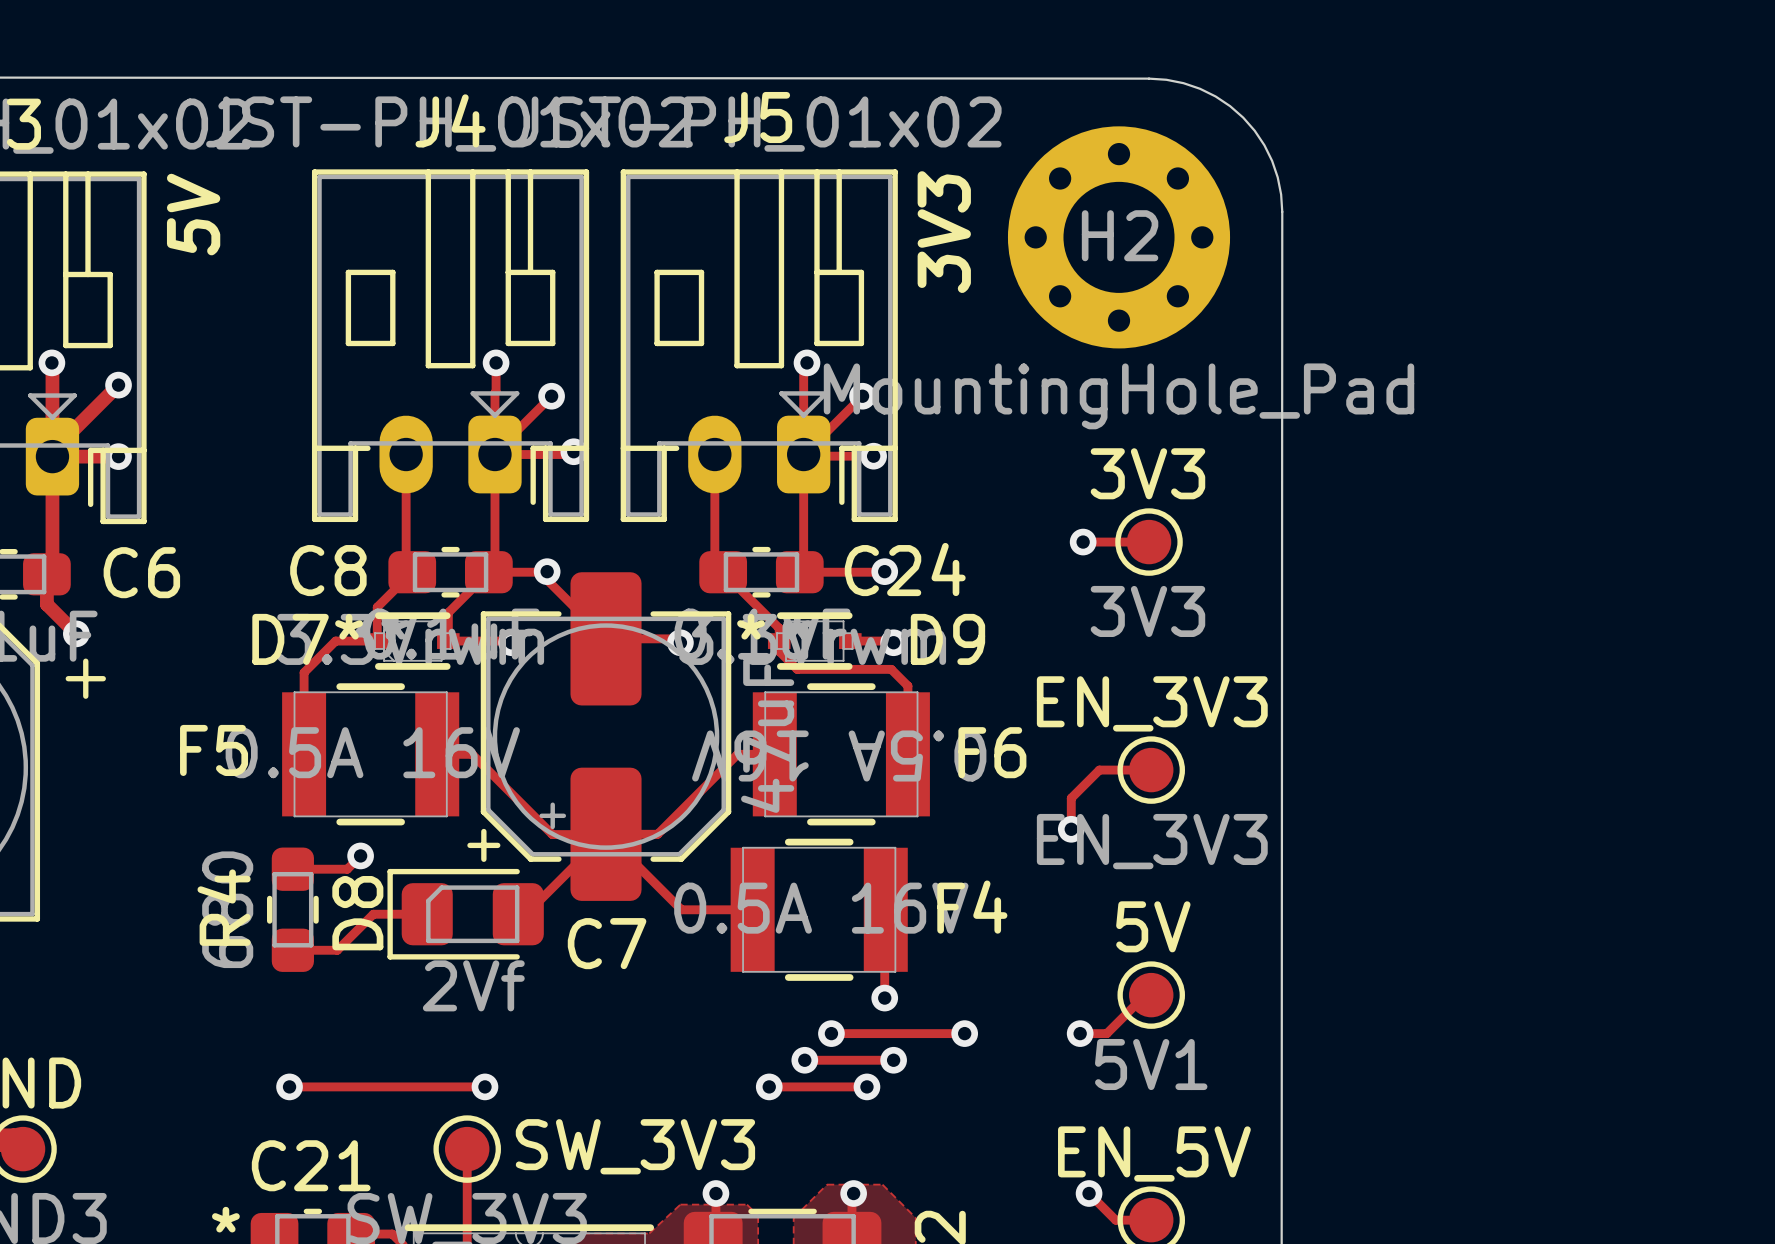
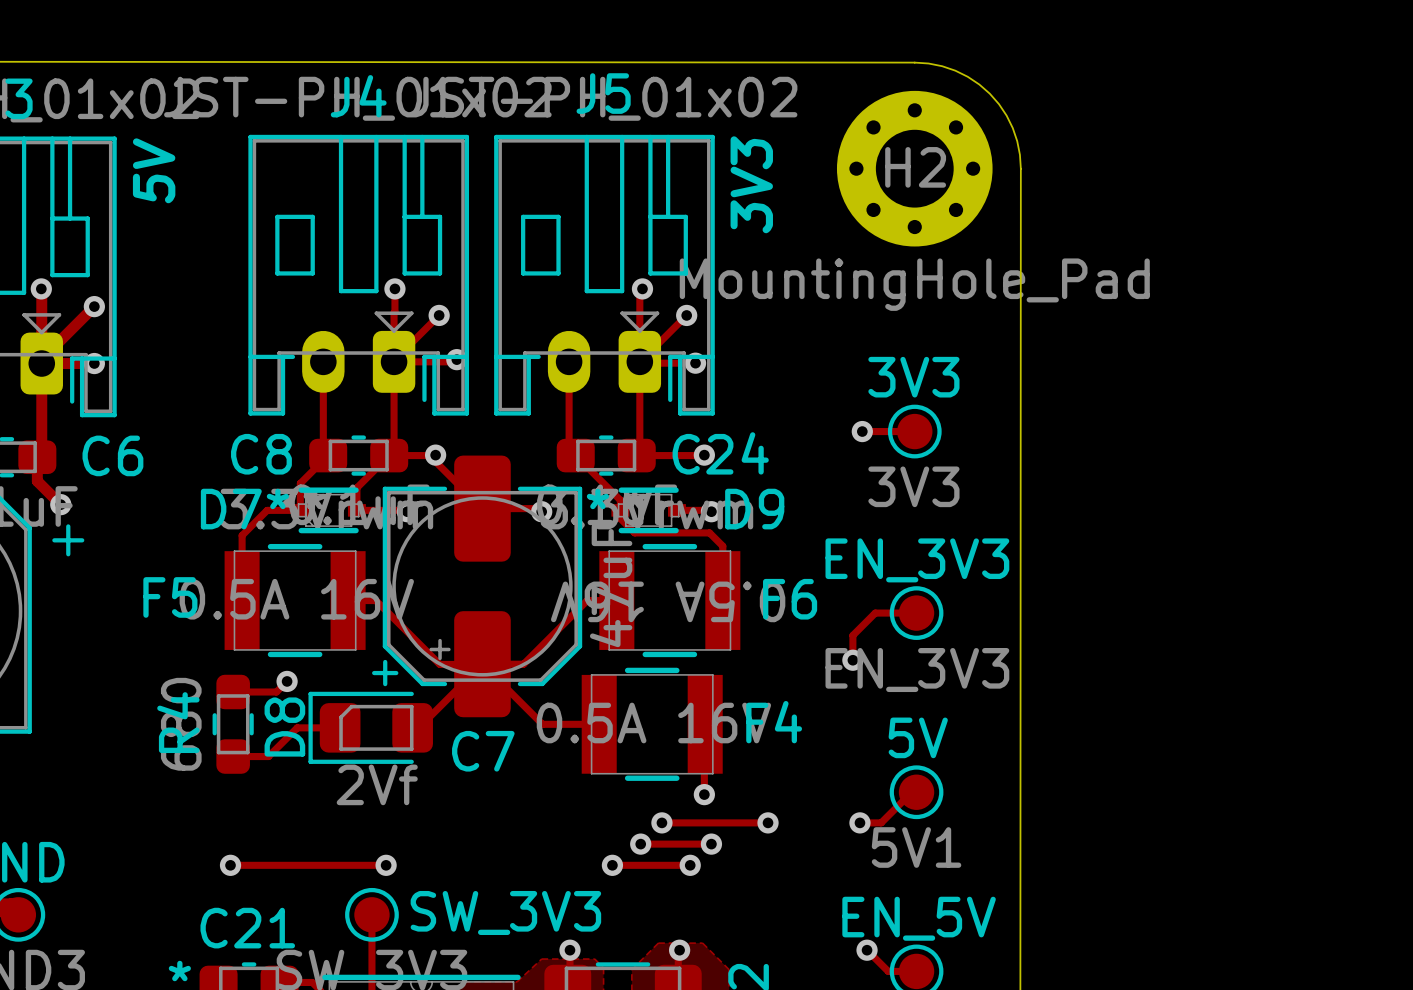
H2 footprint: [1007, 126, 1231, 349] -> [836, 90, 993, 247]

